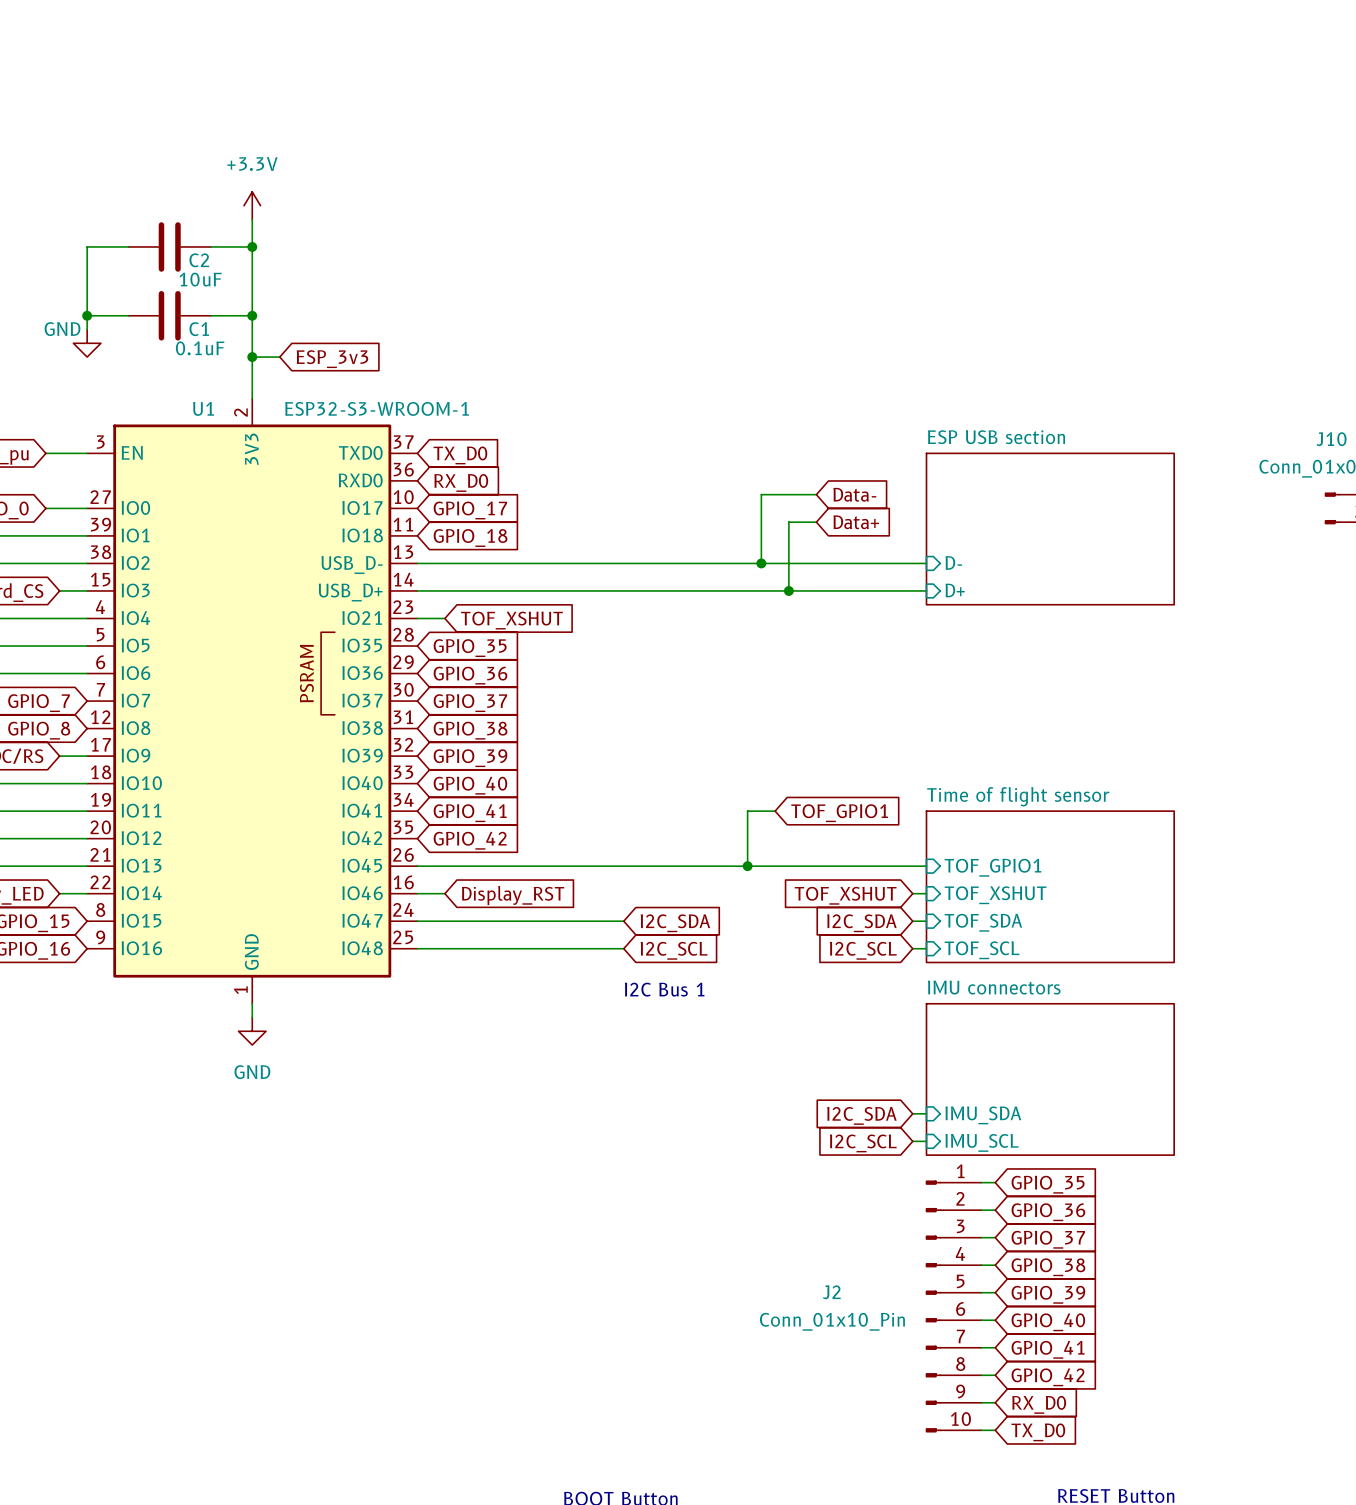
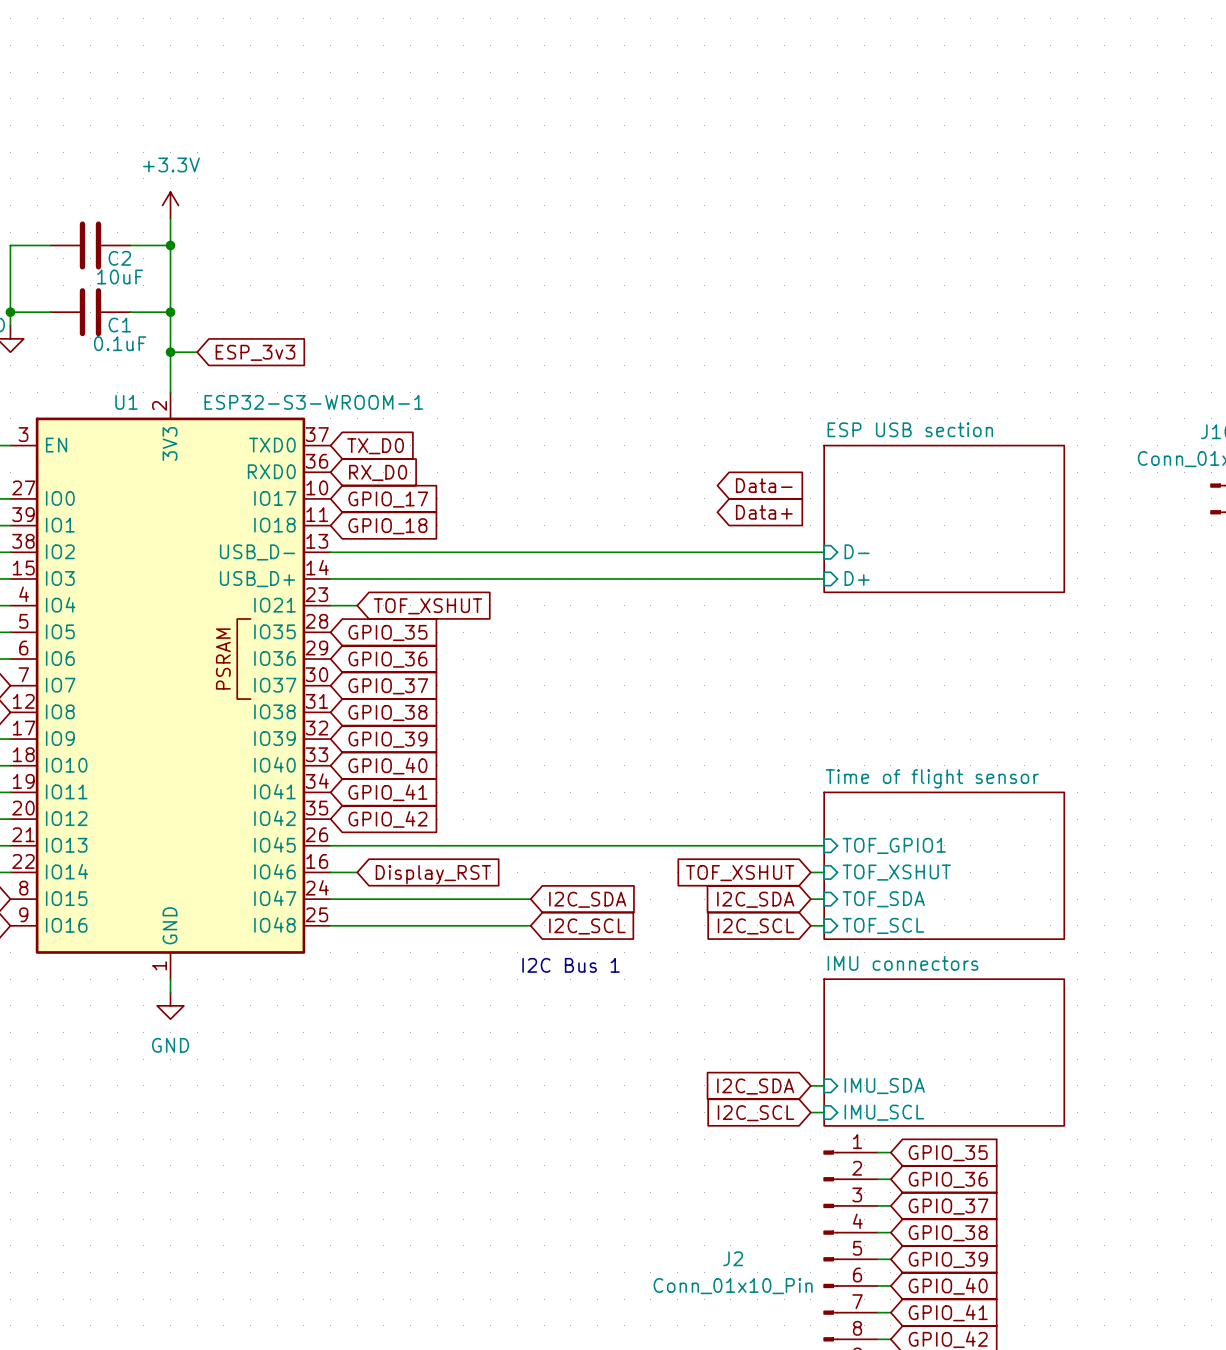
wire: (816, 494) (761, 494) (761, 563) -> none
wire: (816, 522) (788, 522) (788, 590) -> none
junction: (761, 563) -> none
junction: (788, 590) -> none
wire: (775, 811) (747, 811) (747, 866) -> none
global label: TOF_GPIO1 (839, 813) -> none
junction: (747, 866) -> none

